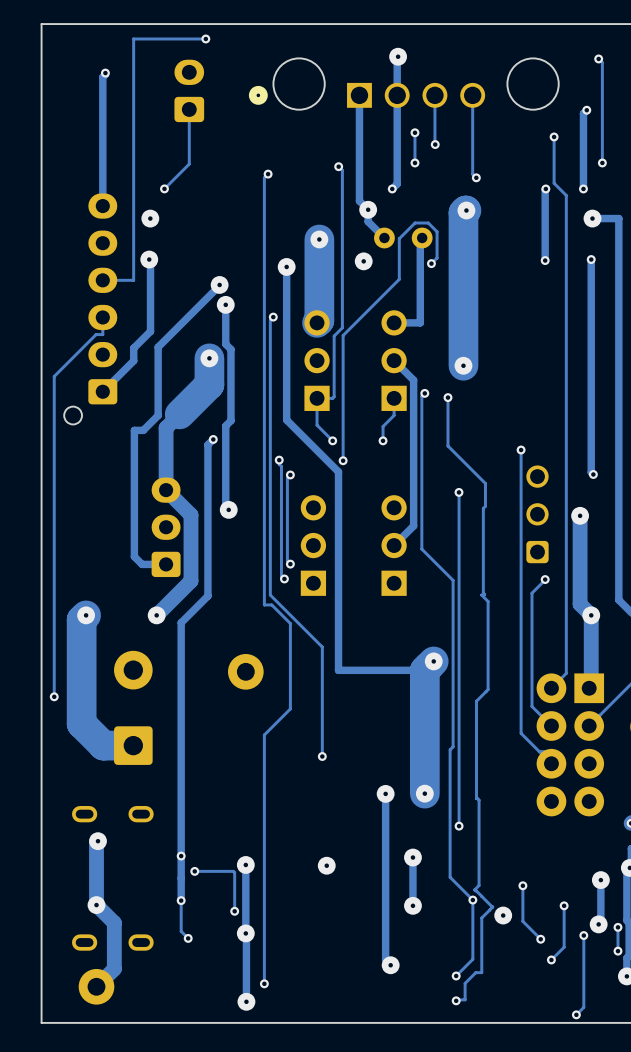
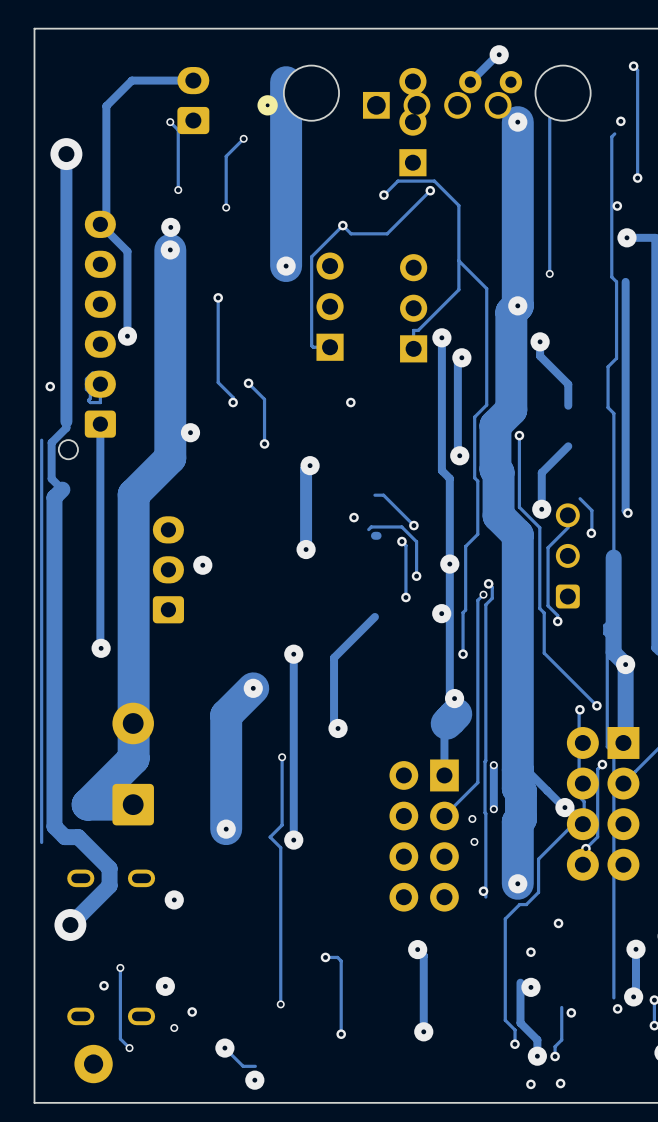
track: (205, 38) (133, 38) (133, 280) (102, 280) -> none
via: (205, 38) -> none
track: none -> (499, 54) (470, 82)
via: none -> (499, 54)
track: (398, 56) (397, 184) (392, 188) -> none
via: (398, 56) -> none
track: none -> (193, 80) (131, 80) (106, 106) (106, 218) (100, 224) (127, 251) (127, 336)
track: (105, 73) (102, 77) (102, 206) -> none
via: (105, 73) -> none
track: none -> (286, 82) (286, 266)
track: (359, 95) (359, 201) (368, 209) (368, 221) (384, 237) -> none
track: (434, 95) (435, 144) -> none
track: (472, 95) (472, 174) (476, 177) -> none
track: none -> (549, 118) (549, 273)
track: (189, 109) (189, 164) (164, 188) -> none
track: none -> (170, 122) (178, 130) (178, 190)
via: none -> (170, 122)
part: none -> (412, 122)
track: none -> (517, 122) (517, 305) (511, 312) (511, 409) (495, 425) (495, 469) (498, 472) (498, 515) (517, 535) (517, 788) (520, 791) (520, 818) (517, 821) (517, 883)
via: none -> (517, 122)
track: (586, 110) (583, 113) (583, 188) -> none
track: none -> (614, 133) (611, 136) (611, 277) (616, 281) (616, 358) (608, 366) (608, 407) (613, 413) (613, 616) (604, 625) (604, 633) (607, 636) (607, 746) (613, 753) (613, 997)
track: none -> (243, 138) (226, 156) (226, 207)
via: none -> (243, 138)
track: (414, 132) (414, 162) -> none
via: (414, 132) -> none
track: (554, 136) (554, 183) (566, 195) (566, 673) (551, 688) -> none
via: (554, 136) -> none
track: none -> (66, 154) (66, 427) (51, 442) (51, 478) (62, 489) (54, 497) (54, 826) (64, 837) (78, 837) (109, 868) (109, 885) (70, 925)
via: none -> (66, 154)
via: (435, 144) -> none
via: (414, 162) -> none
track: (338, 166) (342, 170) (342, 327) (334, 336) (334, 396) (317, 398) (317, 425) (332, 440) -> none
via: (338, 166) -> none
via: none -> (178, 190)
track: (268, 174) (264, 177) (264, 604) (271, 604) (290, 623) (290, 708) (264, 734) (264, 983) -> none
via: (268, 174) -> none
track: none -> (430, 190) (387, 233) (351, 233) (342, 225) (311, 256) (311, 345) (330, 347)
via: none -> (430, 190)
via: (476, 177) -> none
track: none -> (383, 195) (397, 181) (434, 181) (458, 205) (458, 289) (418, 330) (413, 330) (413, 348)
via: none -> (383, 195)
via: (164, 188) -> none
via: (392, 188) -> none
track: (545, 188) (545, 260) -> none
via: (545, 188) -> none
via: none -> (226, 207)
via: none -> (342, 225)
via: none -> (170, 227)
via: (368, 209) -> none
track: (466, 210) (463, 212) (463, 365) -> none
via: (466, 210) -> none
via: (150, 218) -> none
via: none -> (170, 249)
part position: (403, 237) -> (490, 82)
track: (422, 237) (420, 239) (420, 322) (394, 322) -> none
track: (319, 239) (319, 320) (317, 322) -> none
via: (319, 239) -> none
track: none -> (458, 260) (486, 288) (486, 405) (474, 417) (474, 477) (477, 481) (477, 534) (465, 546) (465, 610) (463, 612) (463, 654)
via: none -> (286, 266)
via: none -> (549, 273)
track: (149, 259) (150, 331) (133, 348) (133, 360) (102, 391) -> (101, 648) (100, 424)
via: (149, 259) -> none
via: (591, 259) -> none
via: (545, 260) -> none
via: (363, 261) -> none
track: (431, 263) (437, 258) (437, 231) (428, 223) (415, 223) (399, 238) (399, 279) (343, 335) (343, 460) -> none
via: (431, 263) -> none
track: (286, 266) (286, 420) (338, 471) (338, 670) (424, 670) (424, 793) -> none
via: (286, 266) -> none
track: none -> (218, 297) (218, 382) (233, 397) (233, 402)
via size: [210, 276, 229, 294] -> [213, 293, 224, 303]
via: none -> (517, 305)
part: none -> (330, 306)
track: (219, 284) (158, 347) (158, 415) (143, 430) (134, 430) (134, 556) (142, 564) (166, 564) -> none
part: none -> (413, 308)
track: (225, 304) (225, 344) (230, 349) (230, 420) (225, 425) (225, 506) (228, 509) -> none
via: (225, 304) -> none
via: none -> (127, 336)
track: none -> (441, 337) (441, 470) (449, 478) (449, 696) (454, 698) (444, 708) (444, 775)
via: none -> (441, 337)
track: none -> (540, 341) (540, 356) (568, 384) (568, 405)
via: none -> (540, 341)
track: (102, 317) (102, 334) (96, 334) (54, 376) (54, 696) -> none
track: (273, 317) (270, 320) (270, 595) (322, 647) (322, 756) -> none
via: (273, 317) -> none
track: none -> (461, 357) (457, 361) (457, 453) (459, 455)
via: none -> (461, 357)
track: none -> (92, 372) (86, 379) (86, 389) (90, 393) (90, 402) (100, 402) (100, 384)
track: none -> (248, 383) (264, 399) (264, 443)
via: none -> (248, 383)
via: none -> (50, 386)
track: (209, 358) (209, 384) (166, 428) (166, 490) (190, 515) (190, 581) (156, 615) -> none
via: (209, 358) -> none
part: (317, 360) -> none
track: (394, 360) (413, 380) (413, 525) (394, 545) -> none
part: (394, 360) -> none
via: (463, 365) -> none
via: none -> (233, 402)
via: none -> (350, 402)
track: (424, 393) (421, 396) (421, 549) (453, 580) (453, 746) (450, 749) (450, 877) (472, 900) (472, 959) (456, 975) -> none
via: (424, 393) -> none
track: (447, 397) (447, 446) (485, 483) (485, 506) (483, 508) (484, 594) (481, 595) (488, 601) (488, 689) (476, 701) (479, 885) (474, 889) (481, 896) -> none
via: (447, 397) -> none
track: (394, 398) (394, 415) (383, 426) (383, 440) -> none
via: none -> (190, 432)
track: none -> (519, 435) (519, 507) (539, 527) (539, 608) (544, 612) (544, 653) (596, 705)
via: none -> (519, 435)
track: none -> (41, 440) (41, 842)
via: none -> (264, 443)
track: none -> (568, 446) (541, 472) (541, 509)
via: none -> (459, 455)
track: none -> (310, 465) (306, 469) (306, 549)
via: none -> (310, 465)
track: (213, 439) (207, 444) (207, 596) (181, 622) (181, 931) (188, 938) -> none
via: (213, 439) -> none
via: (332, 440) -> none
via: (383, 440) -> none
track: (521, 450) (521, 733) (539, 751) -> none
via: (521, 450) -> none
track: none -> (374, 495) (383, 495) (413, 525)
track: (279, 460) (281, 466) (281, 577) (284, 578) -> none
via: (279, 460) -> none
via position: (343, 460) -> (354, 517)
track: none -> (580, 498) (591, 510) (591, 533)
via: none -> (541, 509)
track: (290, 474) (287, 477) (287, 561) (290, 564) -> none
via: (290, 474) -> none
via: none -> (413, 525)
track: none -> (568, 527) (548, 547) (548, 605) (557, 615) (557, 621)
track: none -> (368, 529) (371, 526) (401, 526) (416, 541) (416, 576)
via: (458, 492) -> none
track: (459, 492) (459, 826) -> none
via: none -> (591, 533)
track: none -> (377, 535) (374, 535)
track: none -> (401, 541) (405, 545) (405, 597)
via: none -> (401, 541)
via: none -> (306, 549)
via: (228, 509) -> none
via: (580, 515) -> none
via: none -> (449, 564)
via: none -> (202, 565)
via: none -> (416, 576)
track: none -> (488, 583) (492, 587) (492, 598) (485, 604) (485, 897)
via: none -> (488, 583)
part: (313, 545) -> none
part: (394, 545) -> none
track: none -> (483, 594) (477, 600) (477, 782) (444, 816)
via: none -> (483, 594)
via: none -> (405, 597)
via: (290, 564) -> none
via: none -> (441, 613)
track: none -> (374, 616) (334, 657) (334, 725) (338, 728)
via: (284, 578) -> none
track: (545, 579) (531, 593) (531, 706) (551, 726) -> none
via position: (545, 579) -> (557, 621)
track: none -> (293, 654) (293, 840)
via: none -> (293, 654)
via: none -> (463, 654)
track: (86, 615) (81, 619) (81, 723) (103, 745) -> (170, 249) (170, 457) (133, 494) (133, 758) (87, 804) (101, 804)
via position: (86, 615) -> (101, 648)
via: (156, 615) -> none
track: none -> (253, 688) (226, 715) (226, 829)
via: none -> (253, 688)
via: none -> (596, 705)
track: none -> (579, 709) (579, 796) (584, 801) (584, 813) (538, 859) (538, 892) (526, 904) (519, 904) (505, 918) (505, 1020) (515, 1030) (515, 1044)
via: none -> (579, 709)
via position: (433, 661) -> (454, 698)
part: (245, 671) -> none
via: none -> (338, 728)
via: (54, 696) -> none
track: none -> (282, 757) (282, 825) (270, 837) (280, 847) (280, 1004)
via: none -> (282, 757)
track: none -> (493, 765) (493, 809)
via: none -> (493, 765)
track: none -> (602, 764) (597, 769) (597, 836) (585, 848)
via: none -> (602, 764)
track: none -> (517, 770) (526, 770) (564, 807)
via: none -> (564, 807)
via: none -> (493, 809)
via: (322, 756) -> none
via: none -> (472, 818)
via: none -> (226, 829)
part: none -> (424, 835)
via: none -> (293, 840)
via: none -> (474, 841)
via: none -> (585, 848)
track: (385, 793) (385, 960) (390, 965) -> none
via: (385, 793) -> none
via: (424, 793) -> none
via: none -> (517, 883)
via: none -> (174, 899)
track: (97, 841) (96, 905) (114, 922) (114, 968) (96, 986) -> none
via: (97, 841) -> none
via: (181, 856) -> none
via: none -> (558, 923)
via: none -> (70, 925)
track: (412, 857) (412, 905) -> none
via: (412, 857) -> none
track: (245, 864) (246, 1001) -> none
via: (245, 864) -> none
via: (326, 865) -> none
track: (194, 871) (233, 871) (234, 911) -> none
via: (194, 871) -> none
track: none -> (417, 949) (423, 955) (423, 1031)
via: none -> (417, 949)
via: none -> (530, 952)
track: (522, 885) (522, 921) (540, 939) -> none
via: (522, 885) -> none
track: none -> (325, 957) (337, 957) (341, 961) (341, 1034)
via: none -> (325, 957)
via size: [87, 896, 106, 914] -> [99, 980, 109, 991]
track: (481, 896) (492, 907) (481, 918) (481, 972) (475, 972) (465, 983) (465, 999) (456, 1000) -> none
track: none -> (120, 967) (120, 1038) (129, 1048)
via: none -> (120, 967)
via: (181, 900) -> none
via: (472, 900) -> none
via: (412, 905) -> none
track: (564, 905) (564, 947) (551, 959) -> none
via: (564, 905) -> none
via: (234, 911) -> none
track: none -> (520, 982) (520, 1023) (537, 1039) (537, 1056)
via: none -> (165, 986)
via: none -> (280, 1004)
via: (245, 933) -> none
track: none -> (561, 1007) (561, 1039) (555, 1046) (555, 1056)
track: (583, 935) (583, 1007) (576, 1014) -> none
via: none -> (174, 1027)
via: none -> (341, 1034)
via: (551, 959) -> none
via position: (390, 965) -> (423, 1031)
via: none -> (514, 1044)
via: none -> (129, 1048)
track: none -> (224, 1048) (243, 1066) (255, 1066)
via: none -> (224, 1048)
via: (456, 975) -> none
via: none -> (537, 1056)
via: none -> (555, 1056)
via: (264, 983) -> none
via: (456, 1000) -> none
via: none -> (560, 1083)
via: none -> (530, 1084)
via: (576, 1014) -> none

